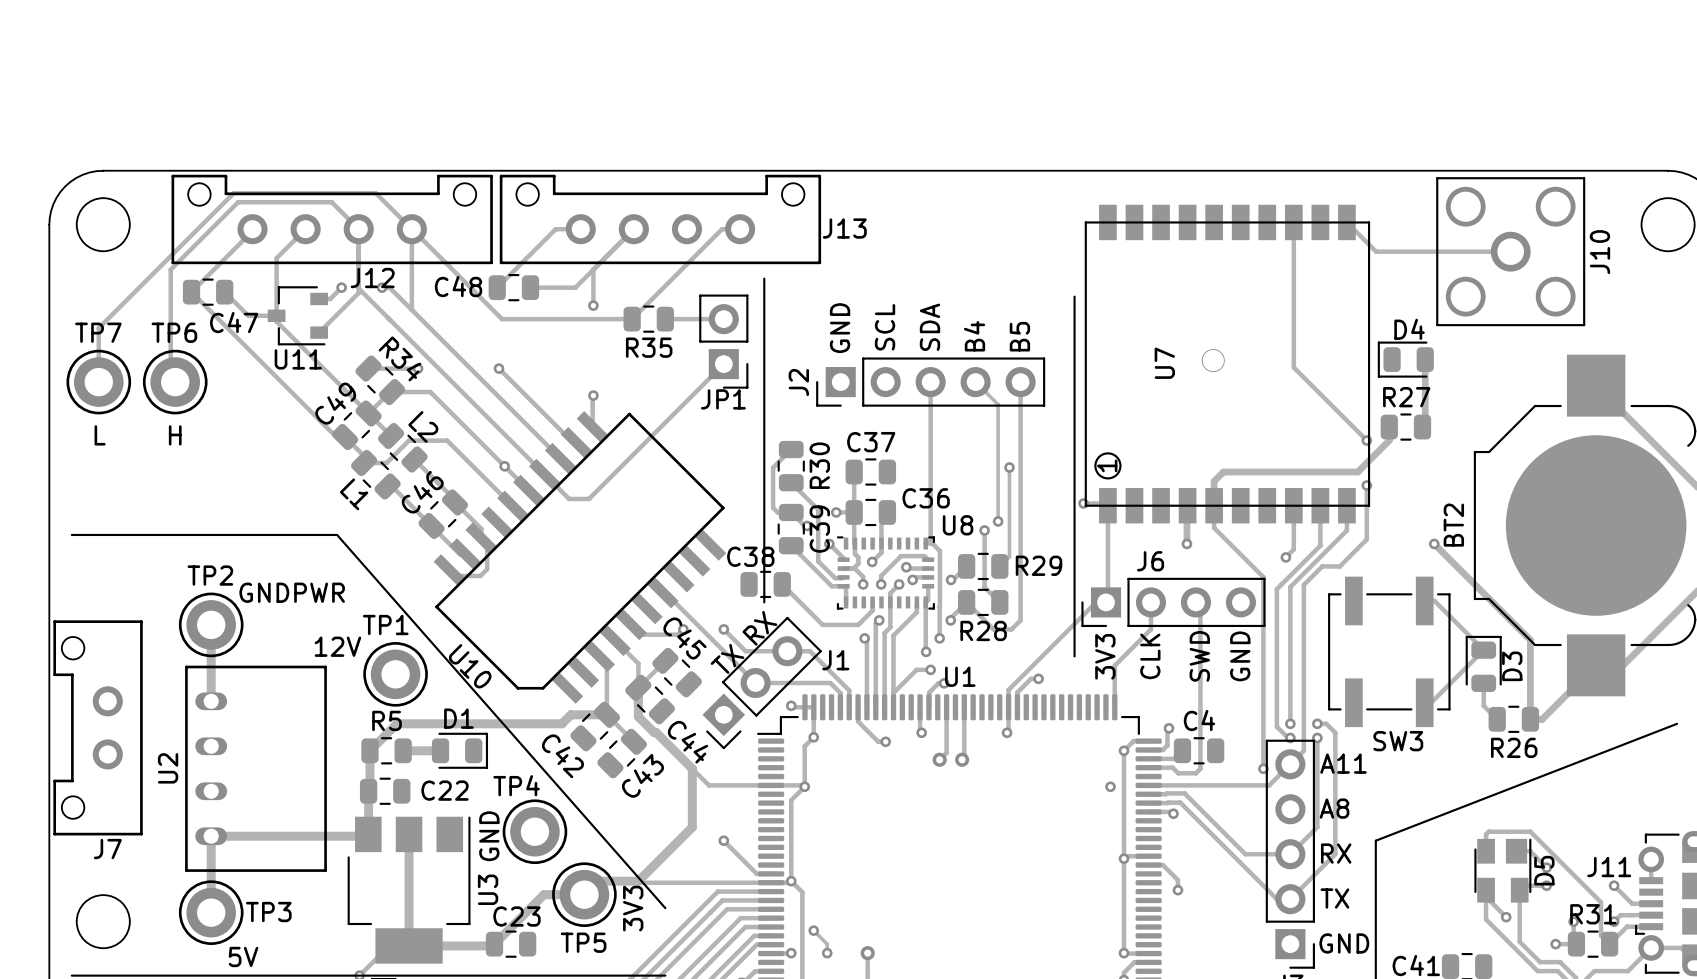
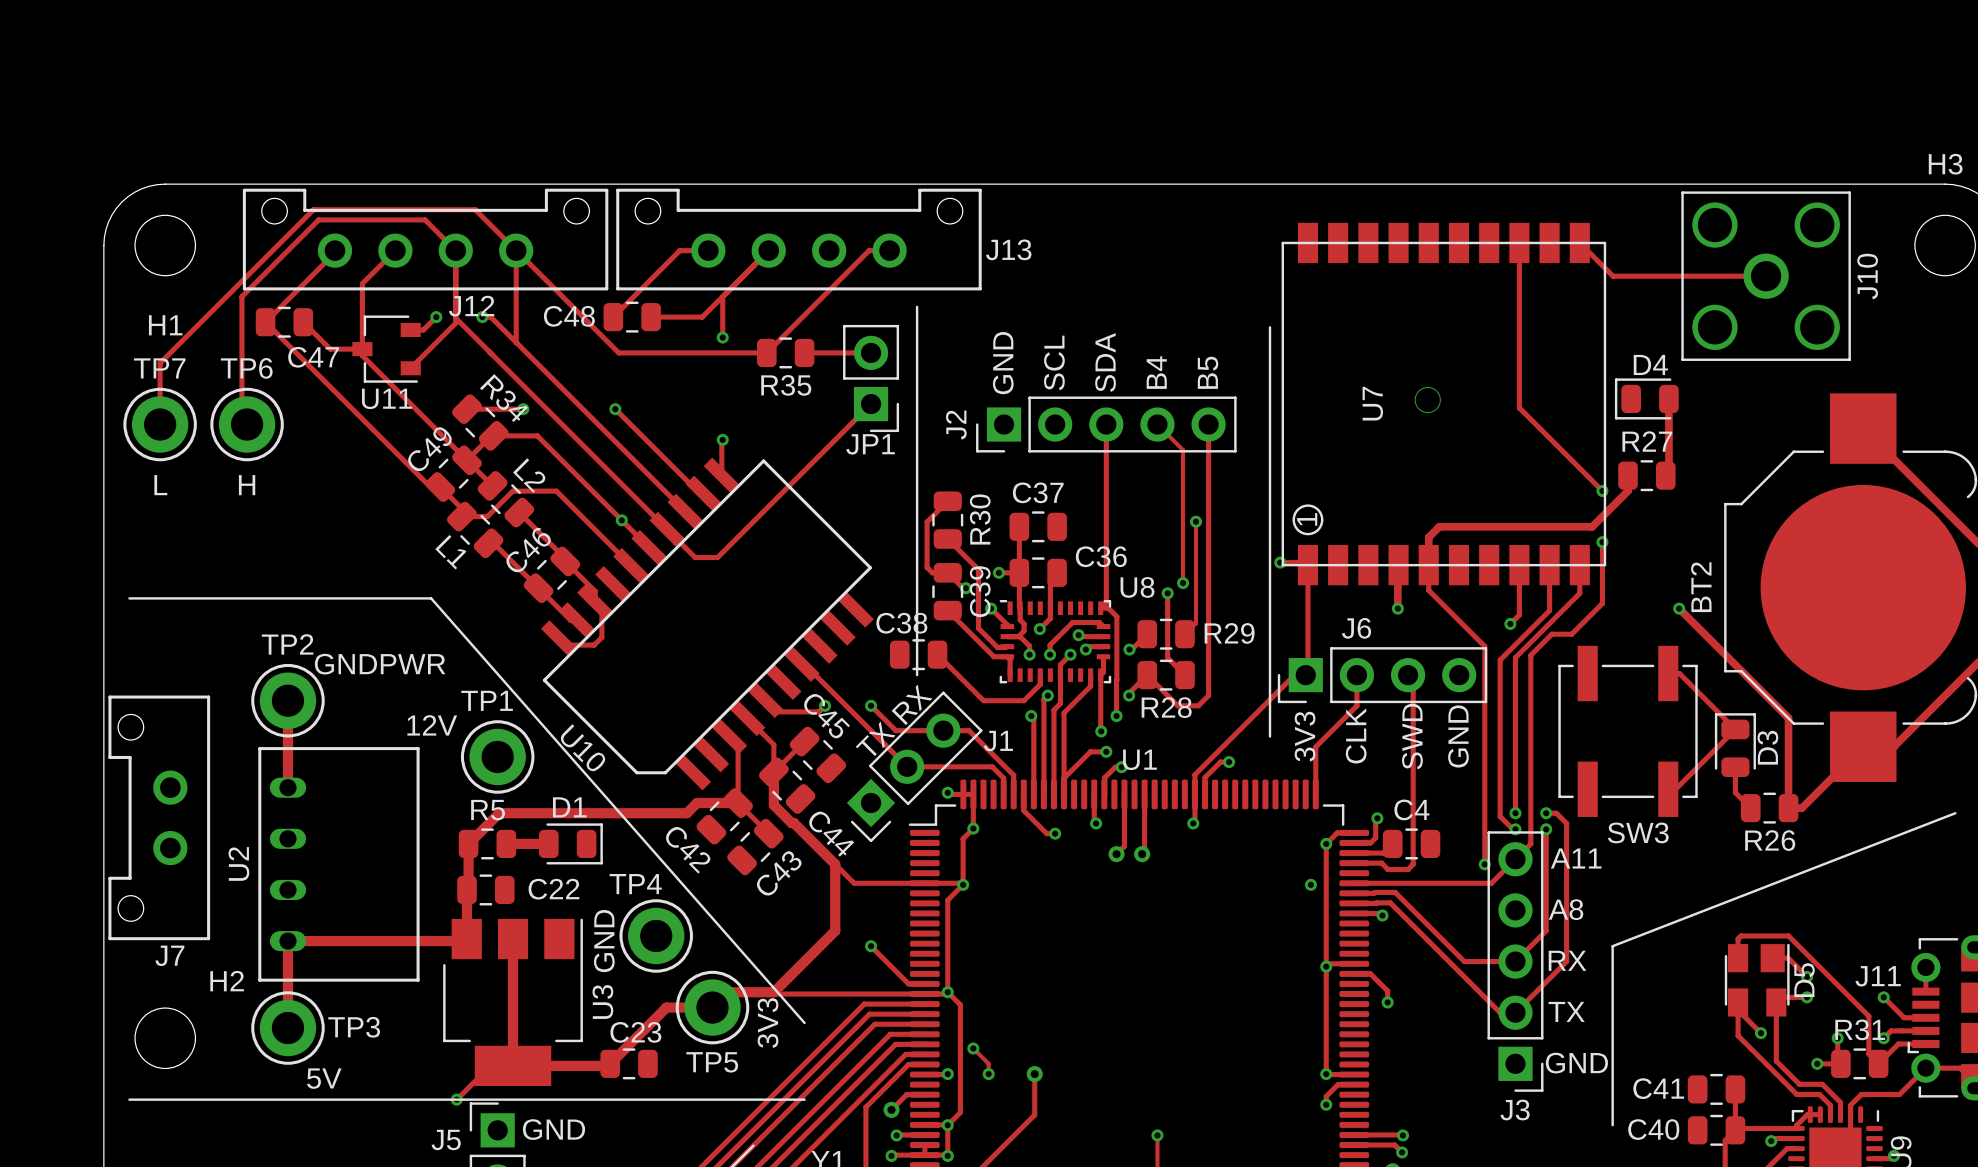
H3 name: none -> H3 (1945, 164)
H1 name: none -> H1 (165, 325)
H2 name: none -> H2 (227, 981)

